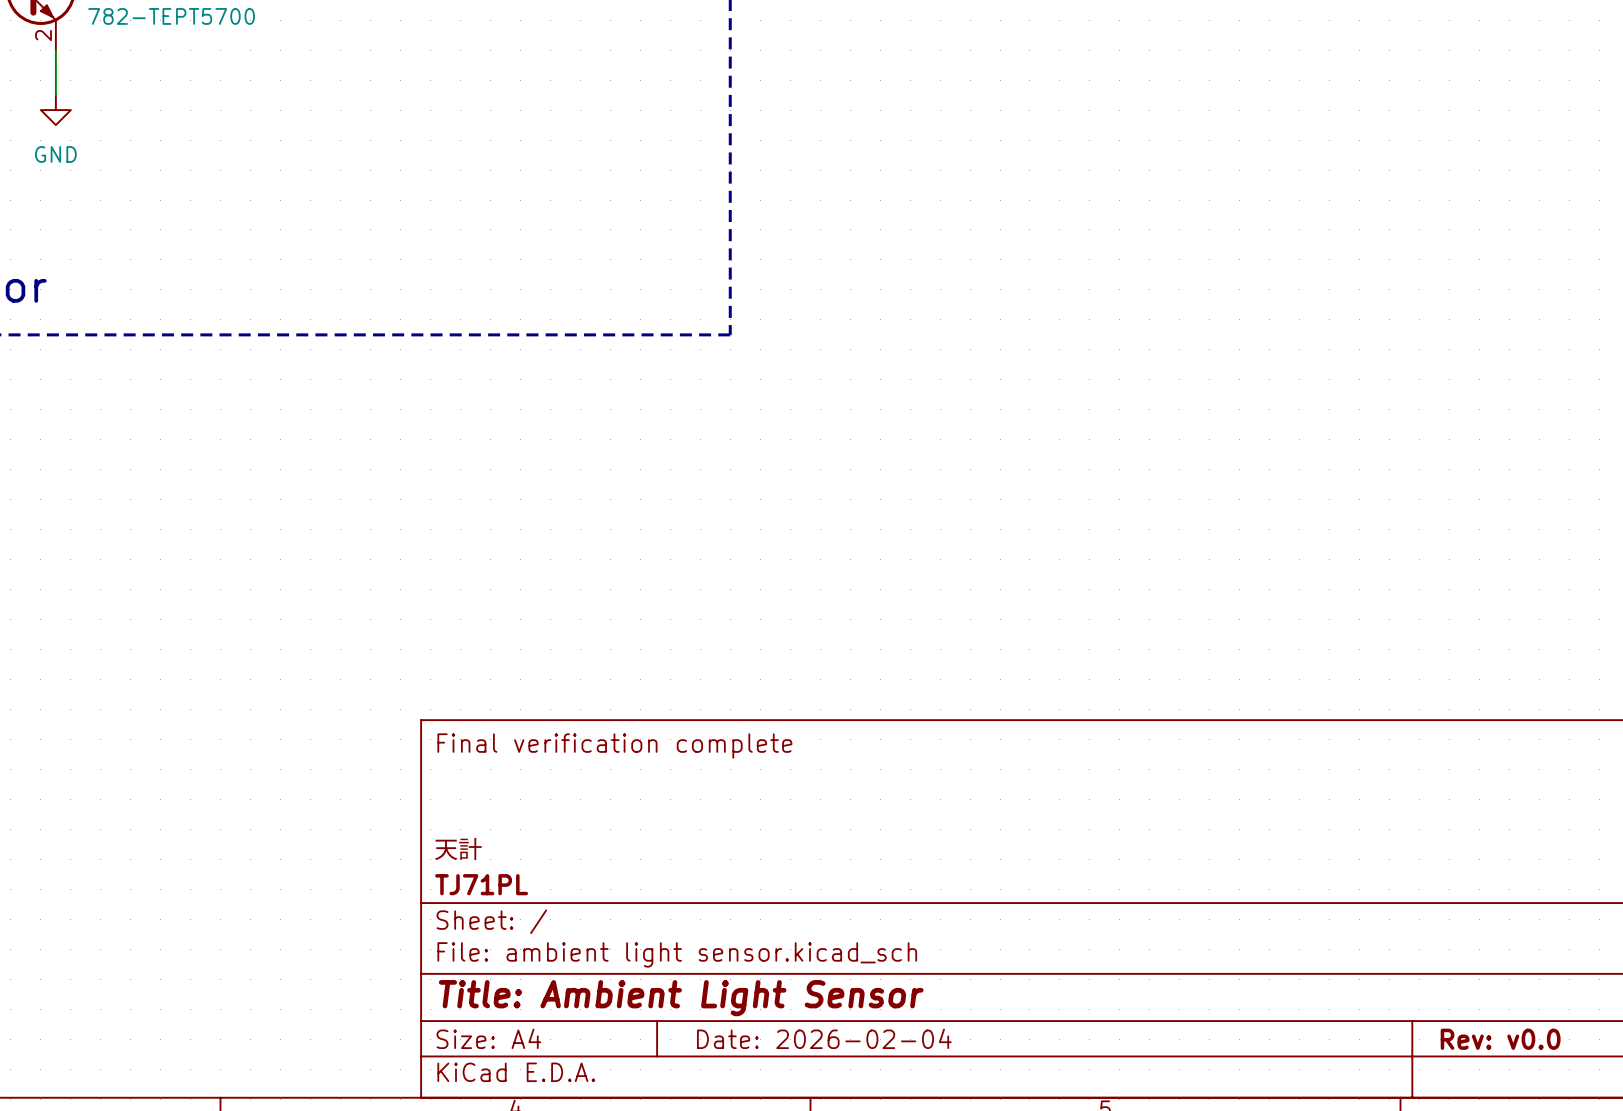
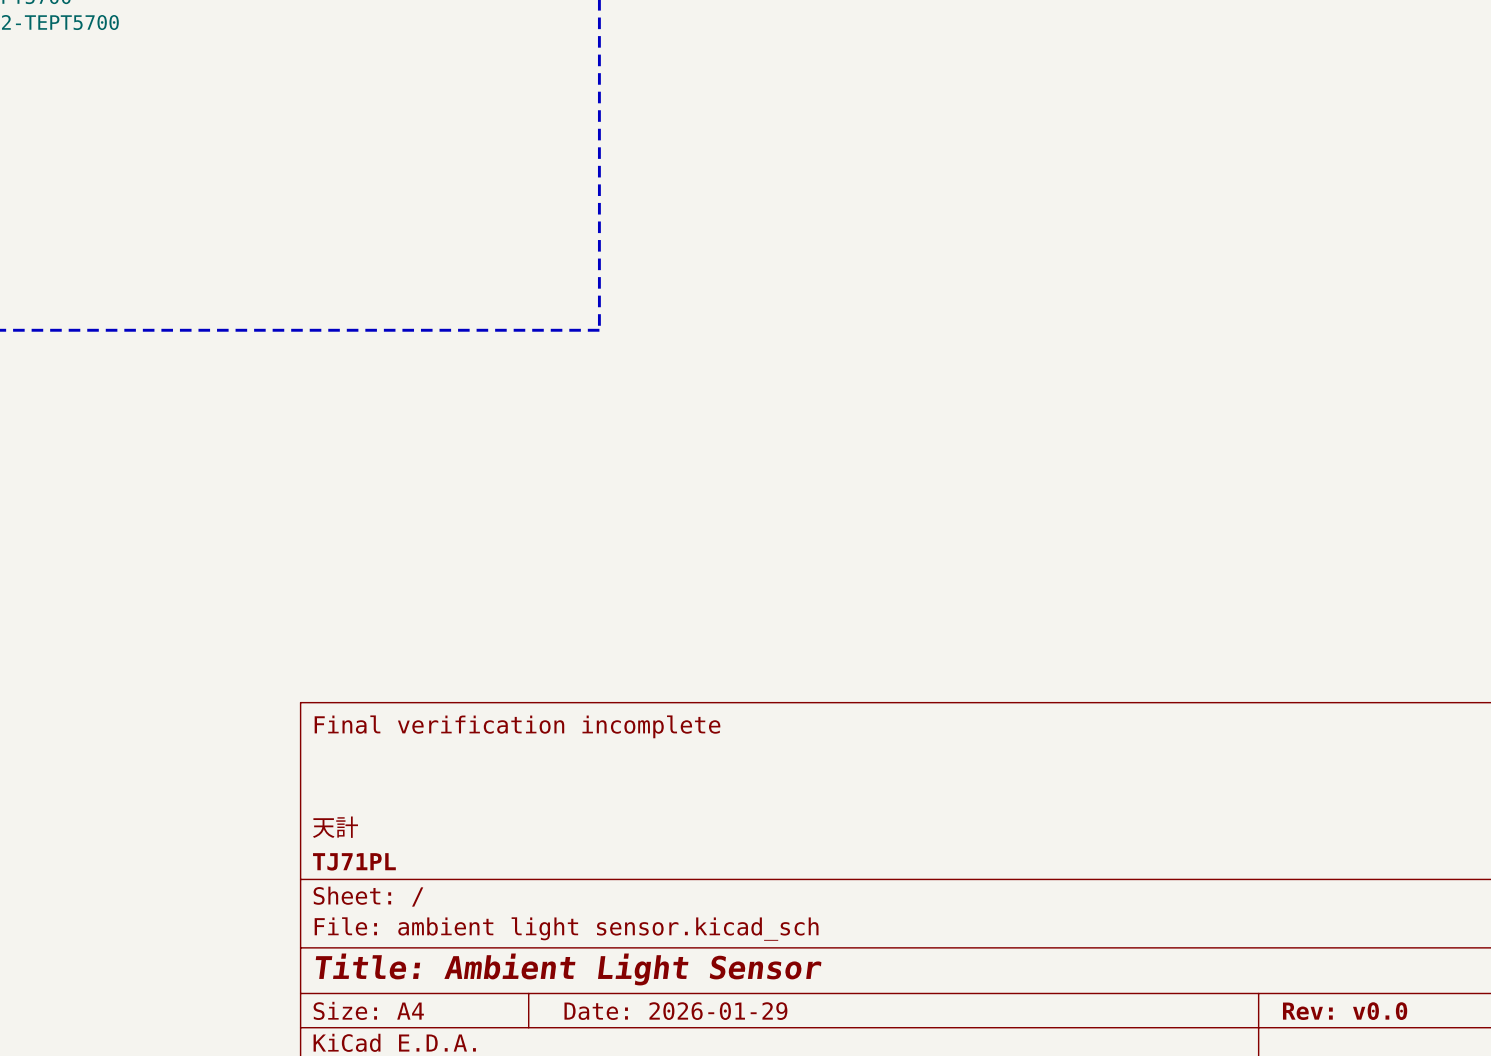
title block: Final verification complete (614, 746) -> Final verification incomplete (517, 726)
title block: Date: 2026-02-04 (824, 1038) -> Date: 2026-01-29 (675, 1011)

